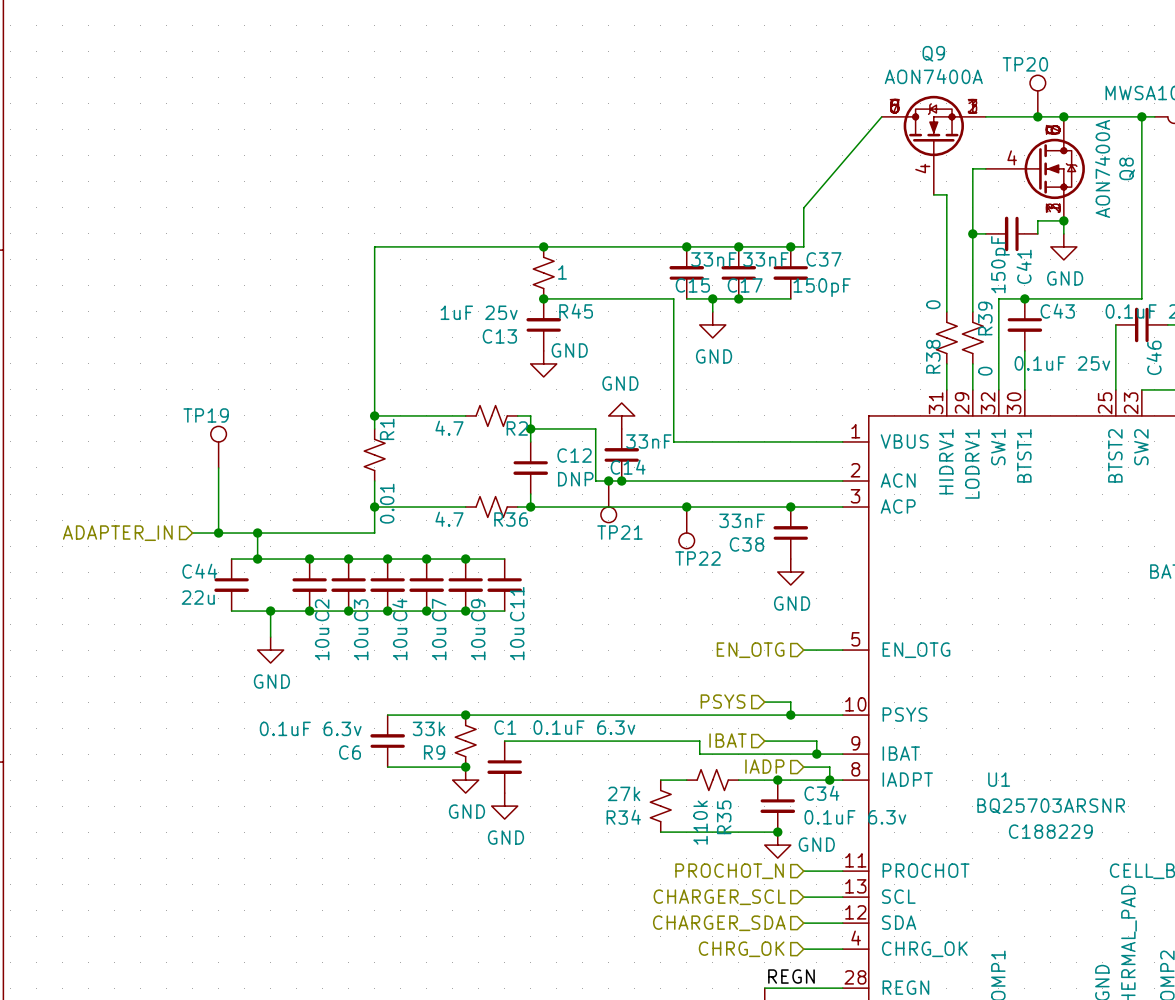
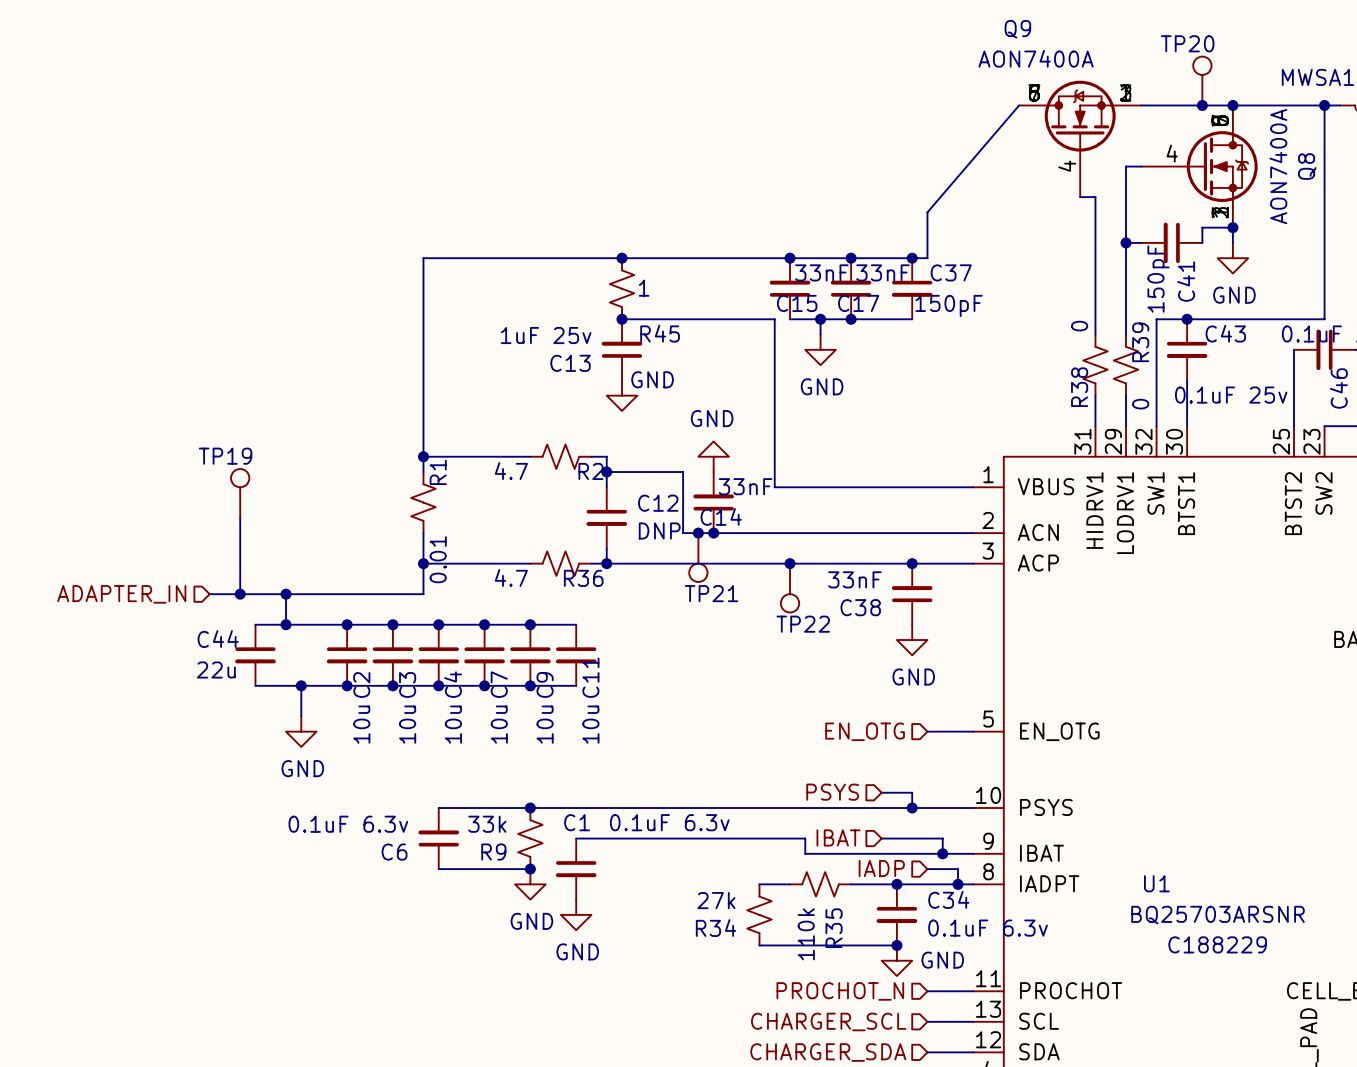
Q9 name position: Q9 (933, 53) -> Q9 (1017, 29)
Q9 value position: AON7400A (933, 76) -> AON7400A (1036, 58)
Q9 symbol: [881, 95, 986, 195] -> [1019, 80, 1142, 198]

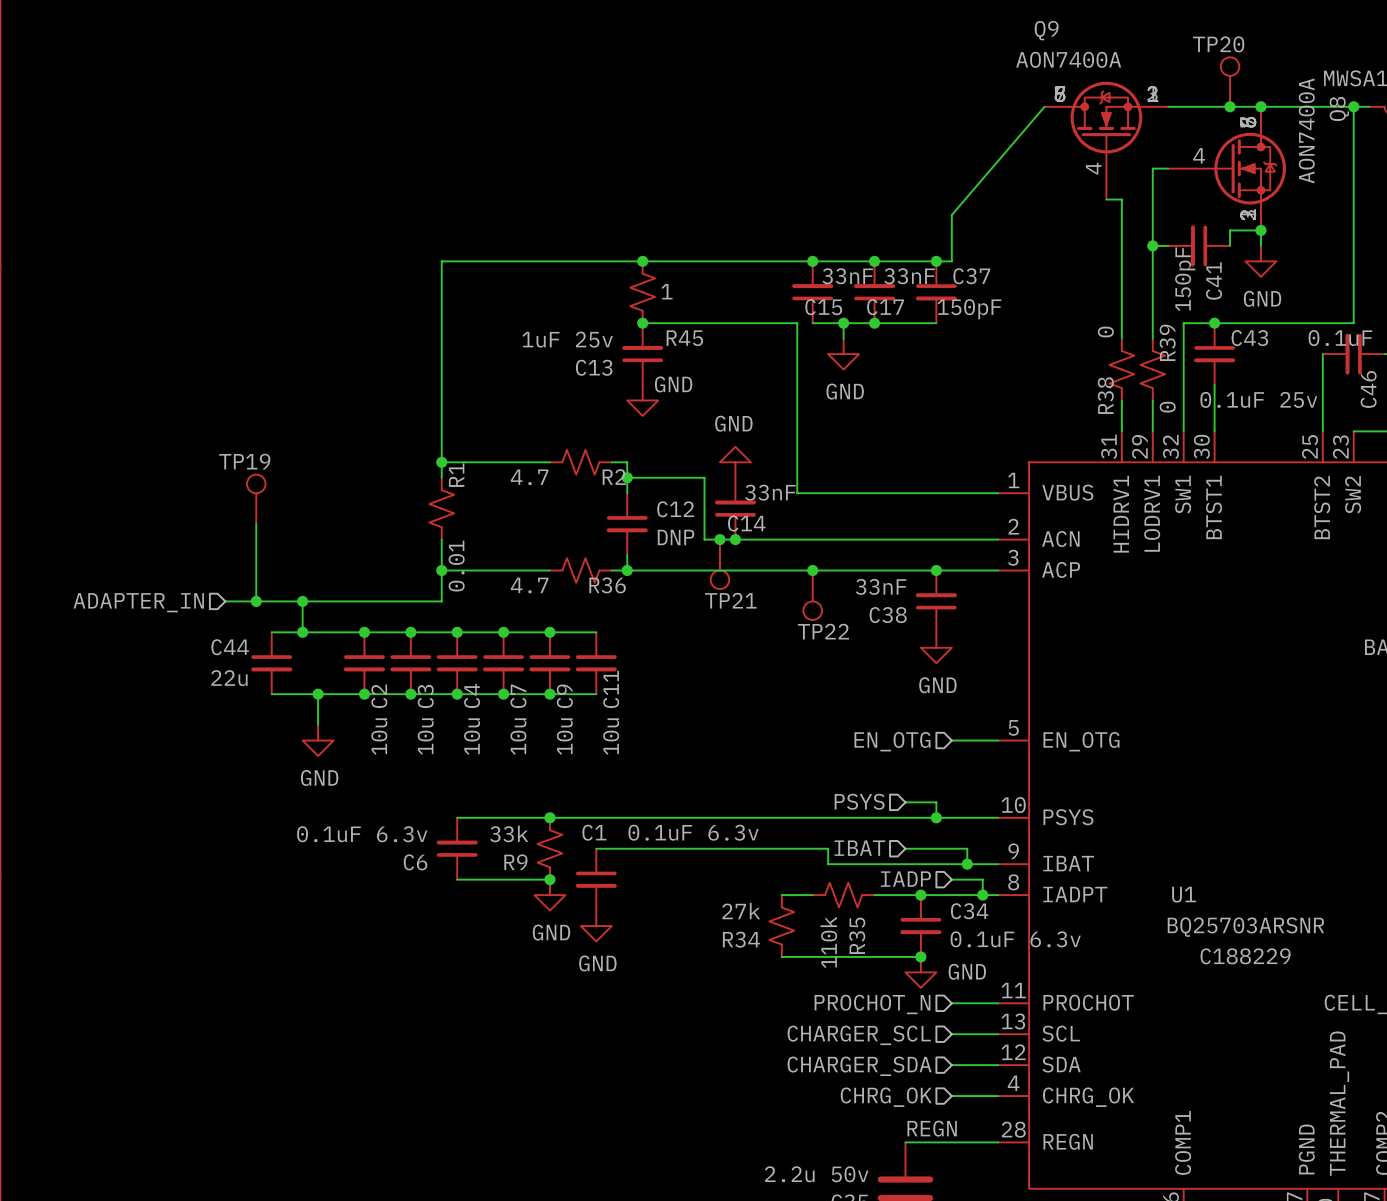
Q8 symbol: [1141, 105, 1258, 228] -> [1168, 106, 1287, 231]
Q8 value position: AON7400A (1278, 166) -> AON7400A (1306, 130)
Q8 name position: Q8 (1307, 166) -> Q8 (1339, 108)

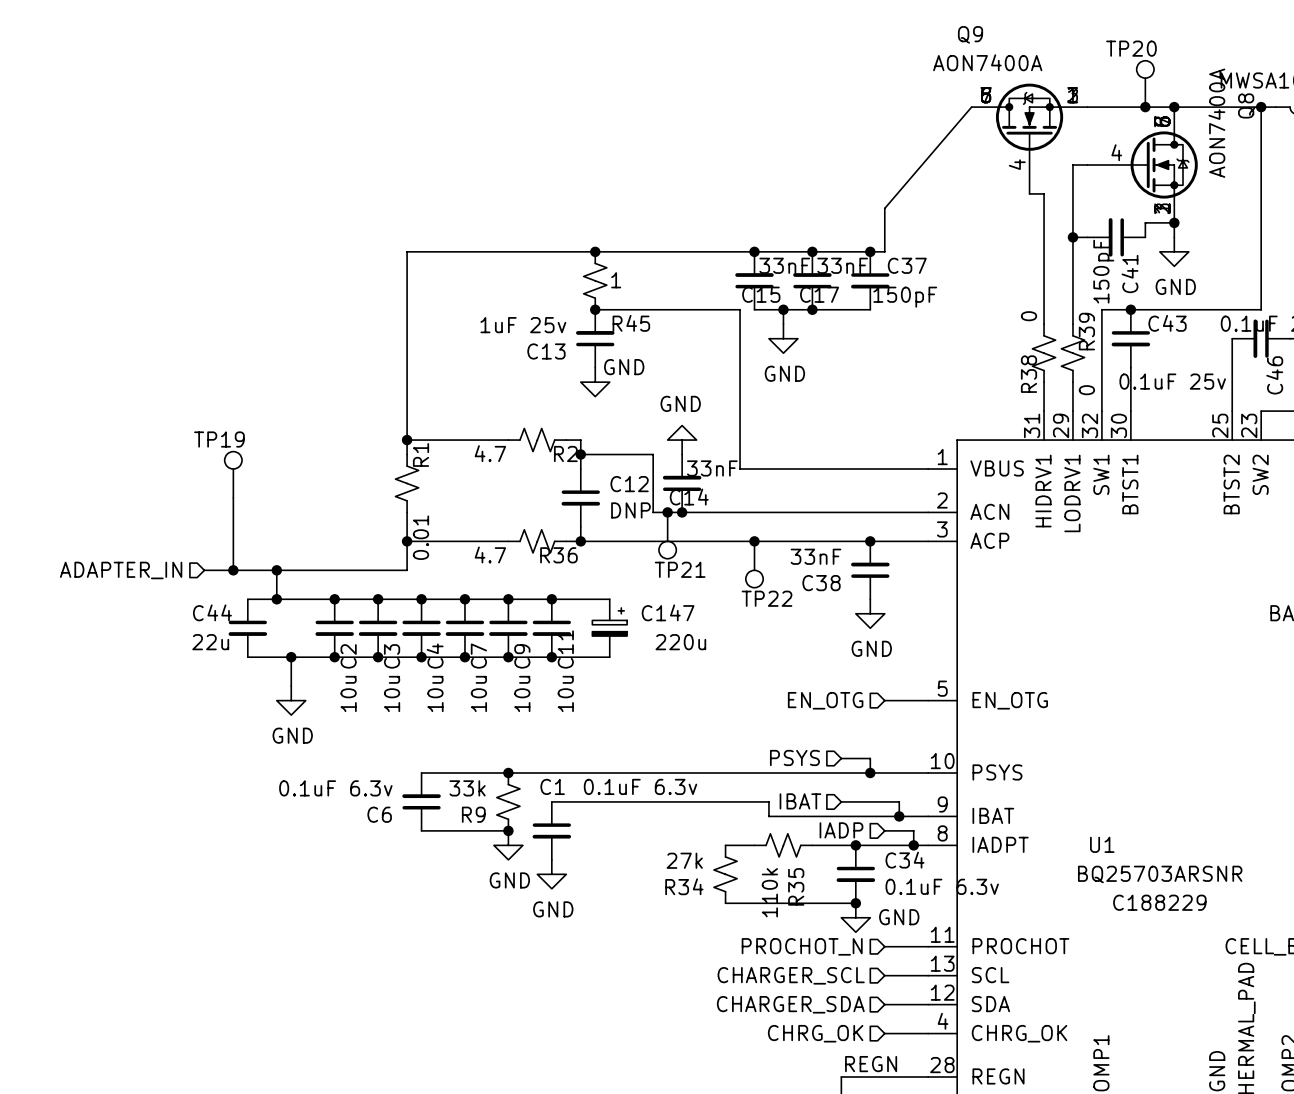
wire: none -> (551, 599) (609, 599)
junction: none -> (551, 599)
C147: none -> 220u (609, 628)
wire: none -> (551, 657) (609, 657)
junction: none -> (551, 657)

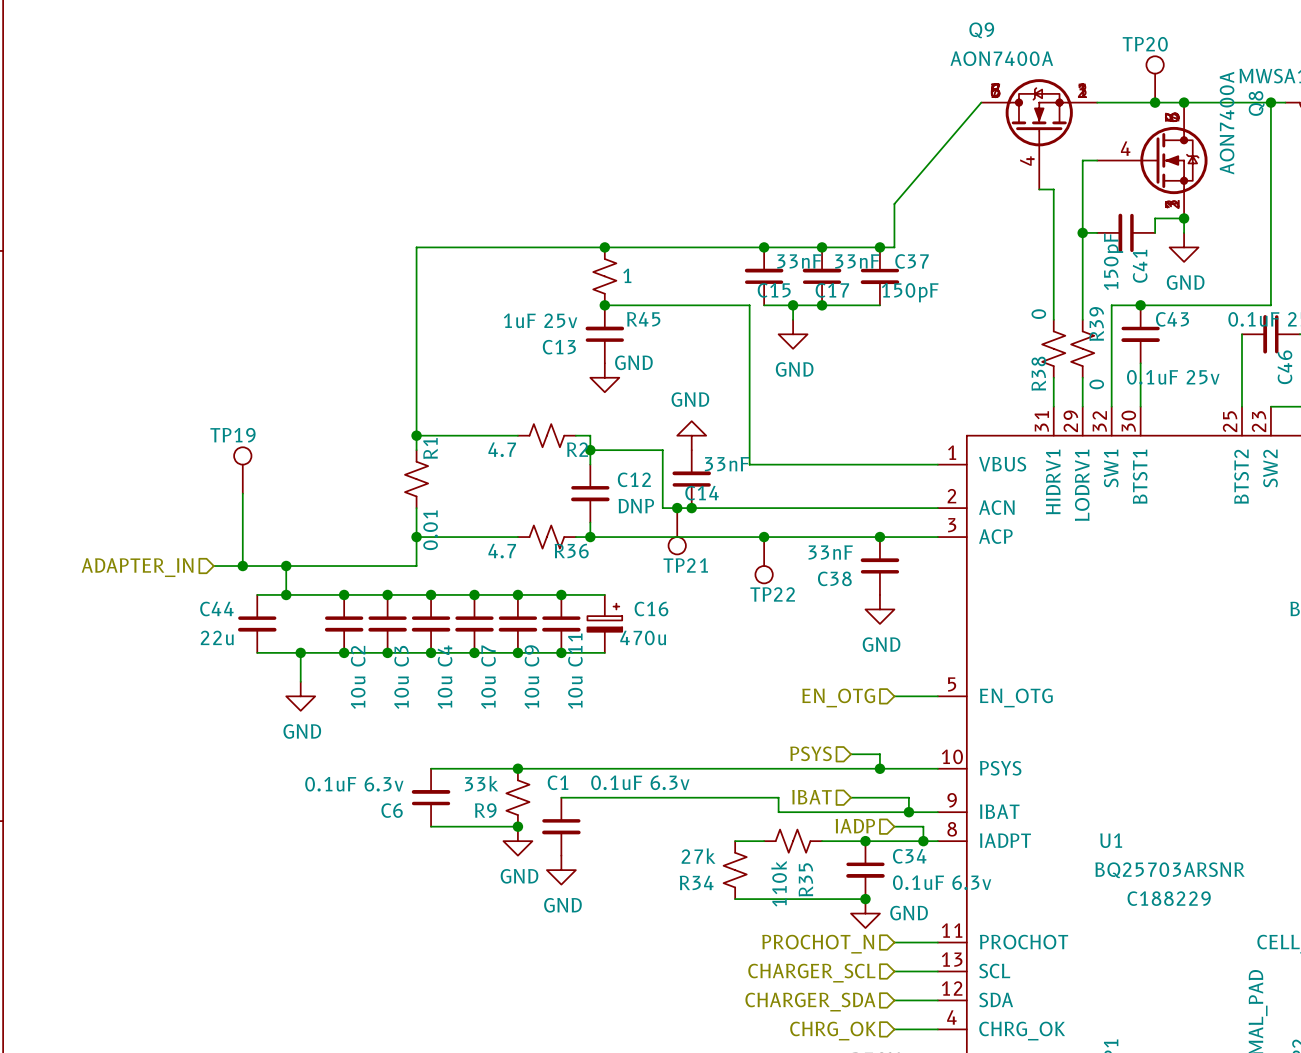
wire: (595, 599) (609, 599) -> none
C16: none -> 470u (604, 623)
C147: 220u (609, 628) -> none
wire: (595, 657) (609, 657) -> none

